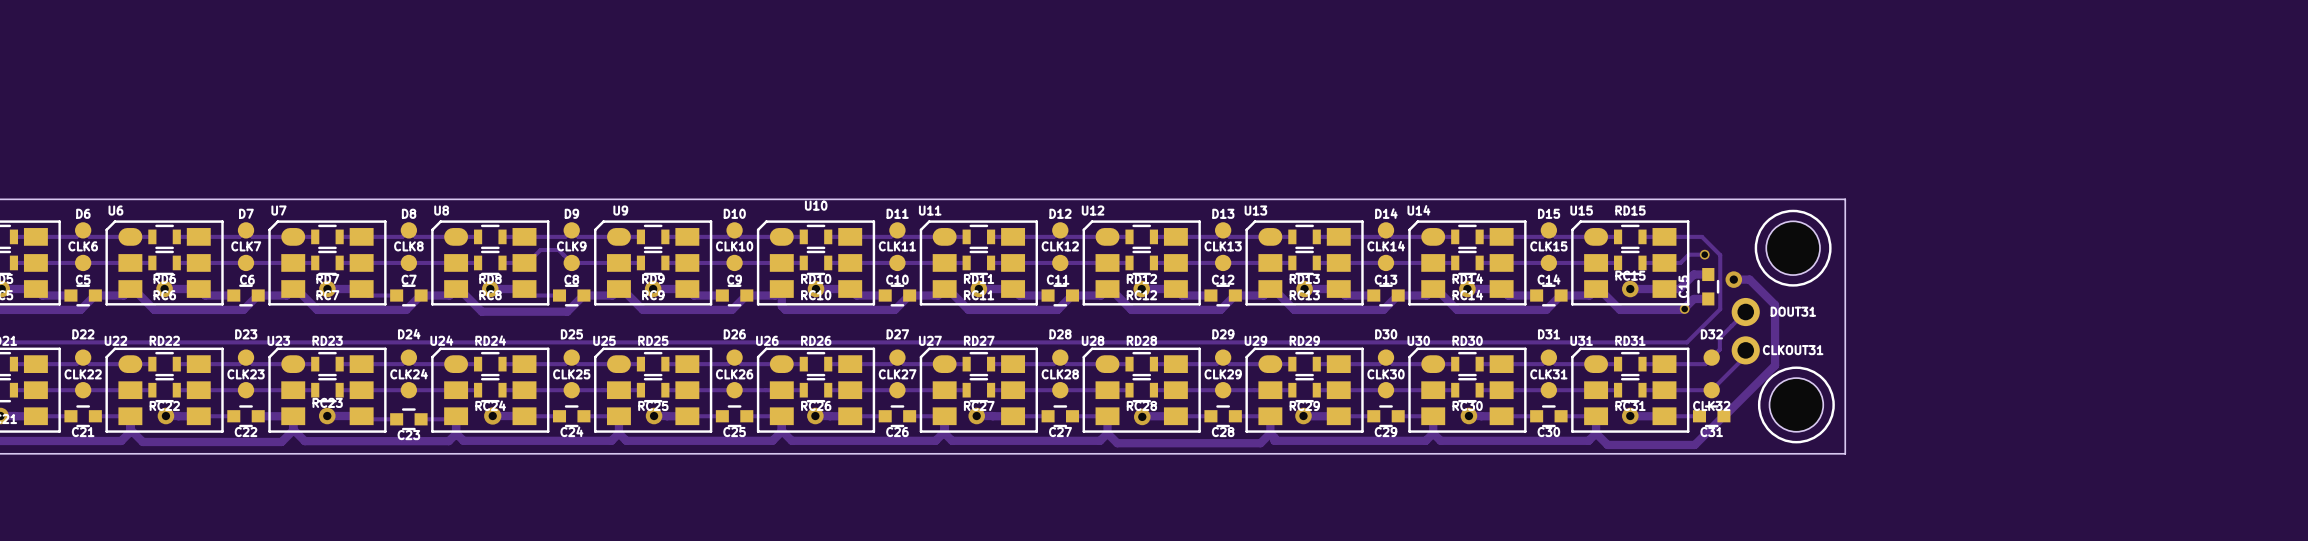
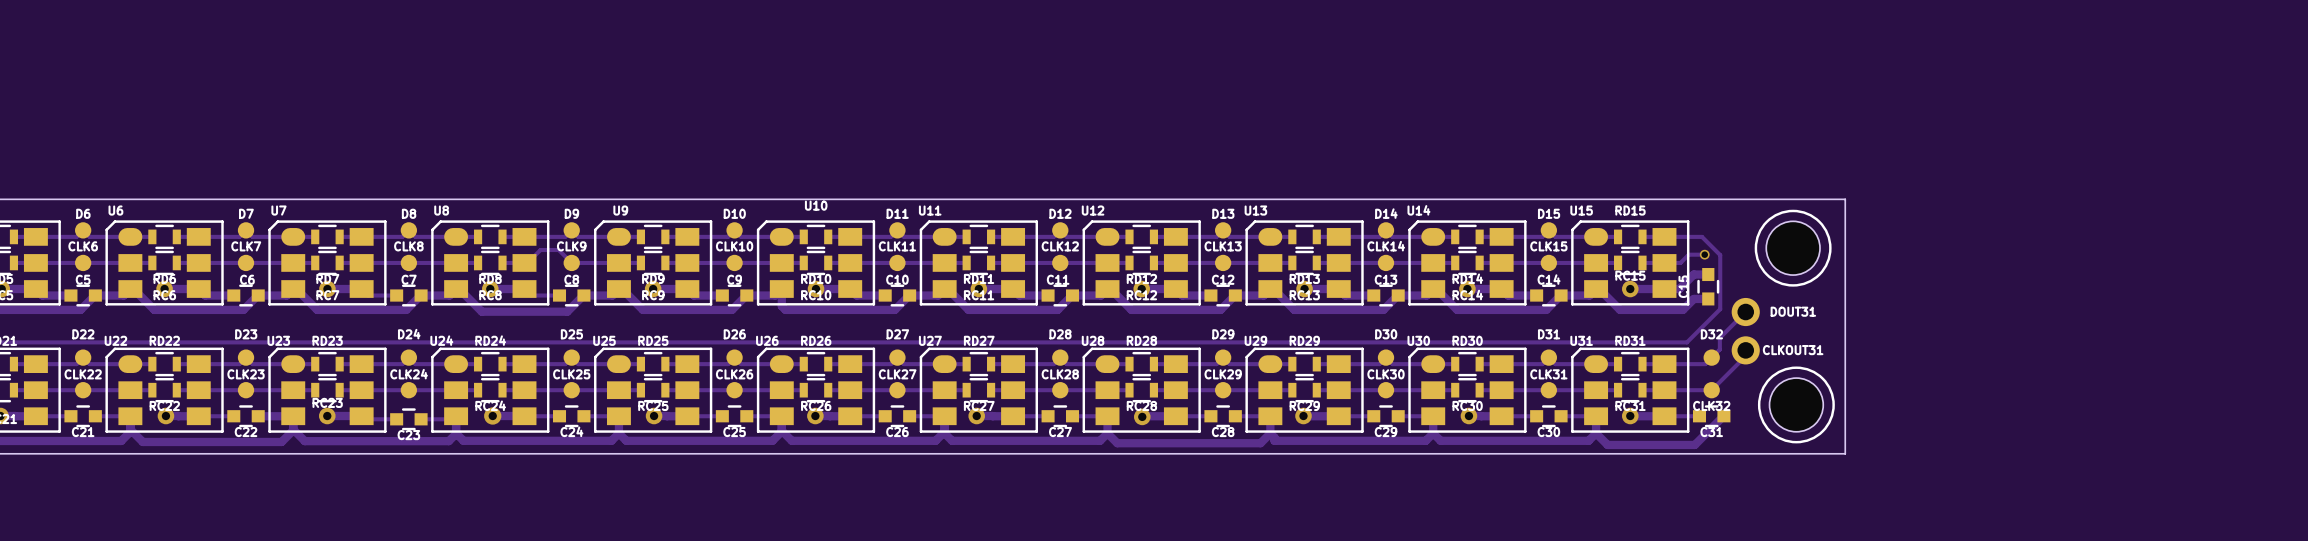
track: (1733, 279) (1749, 279) (1775, 305) (1775, 365) (1724, 416) -> none
via: (1733, 279) -> none
via: (1684, 309) -> none

